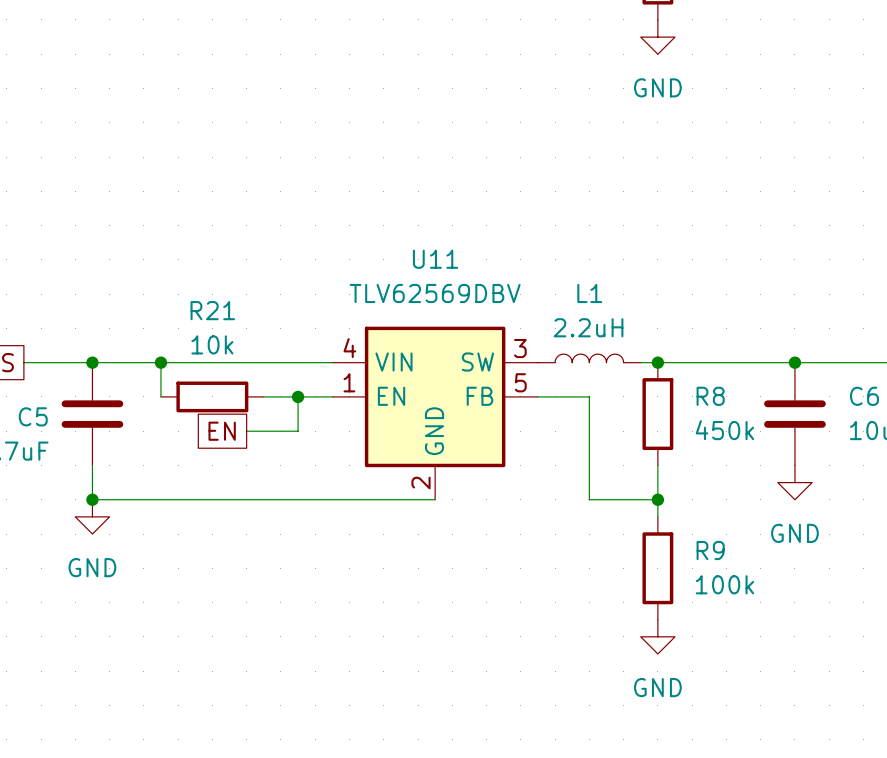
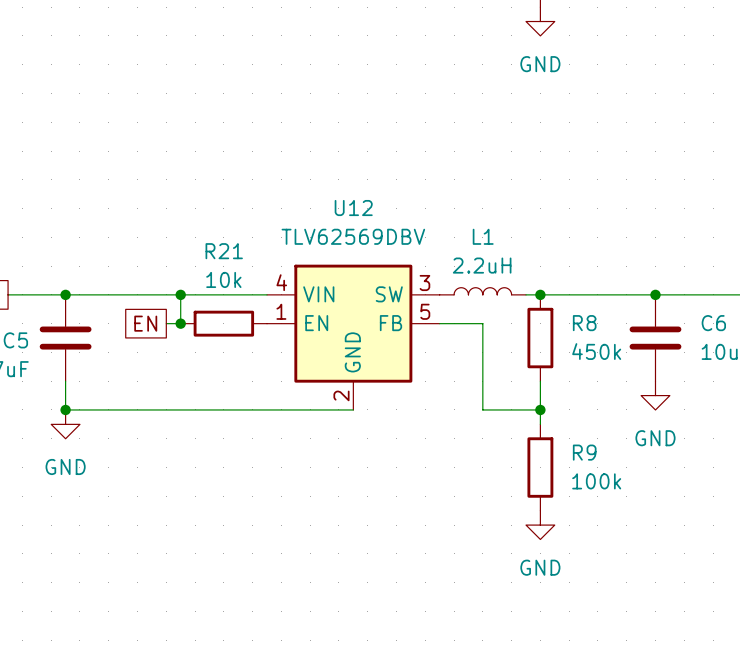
U11 name: U11 (435, 259) -> U12 (353, 208)
wire: (160, 362) (160, 396) -> none
junction: (160, 362) -> none
wire: none -> (180, 294) (180, 323) (166, 323)
junction: none -> (180, 294)
R21 position: (212, 396) -> (223, 323)
junction: none -> (180, 323)
wire: (263, 396) (332, 396) -> none
wire: (298, 396) (298, 431) (246, 431) -> none
junction: (298, 396) -> none
global label position: EN (222, 431) -> EN (145, 323)

